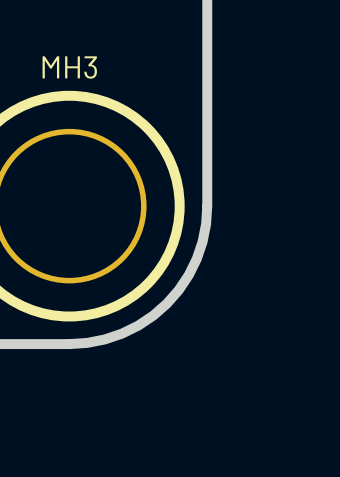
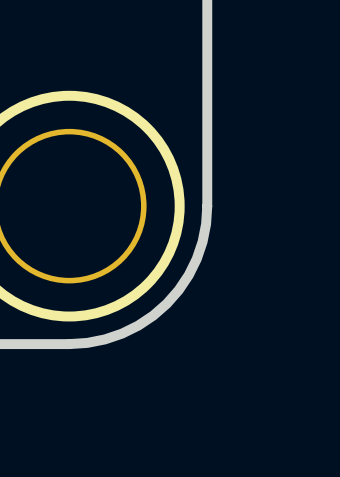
MH3 name: MH3 (69, 67) -> none

